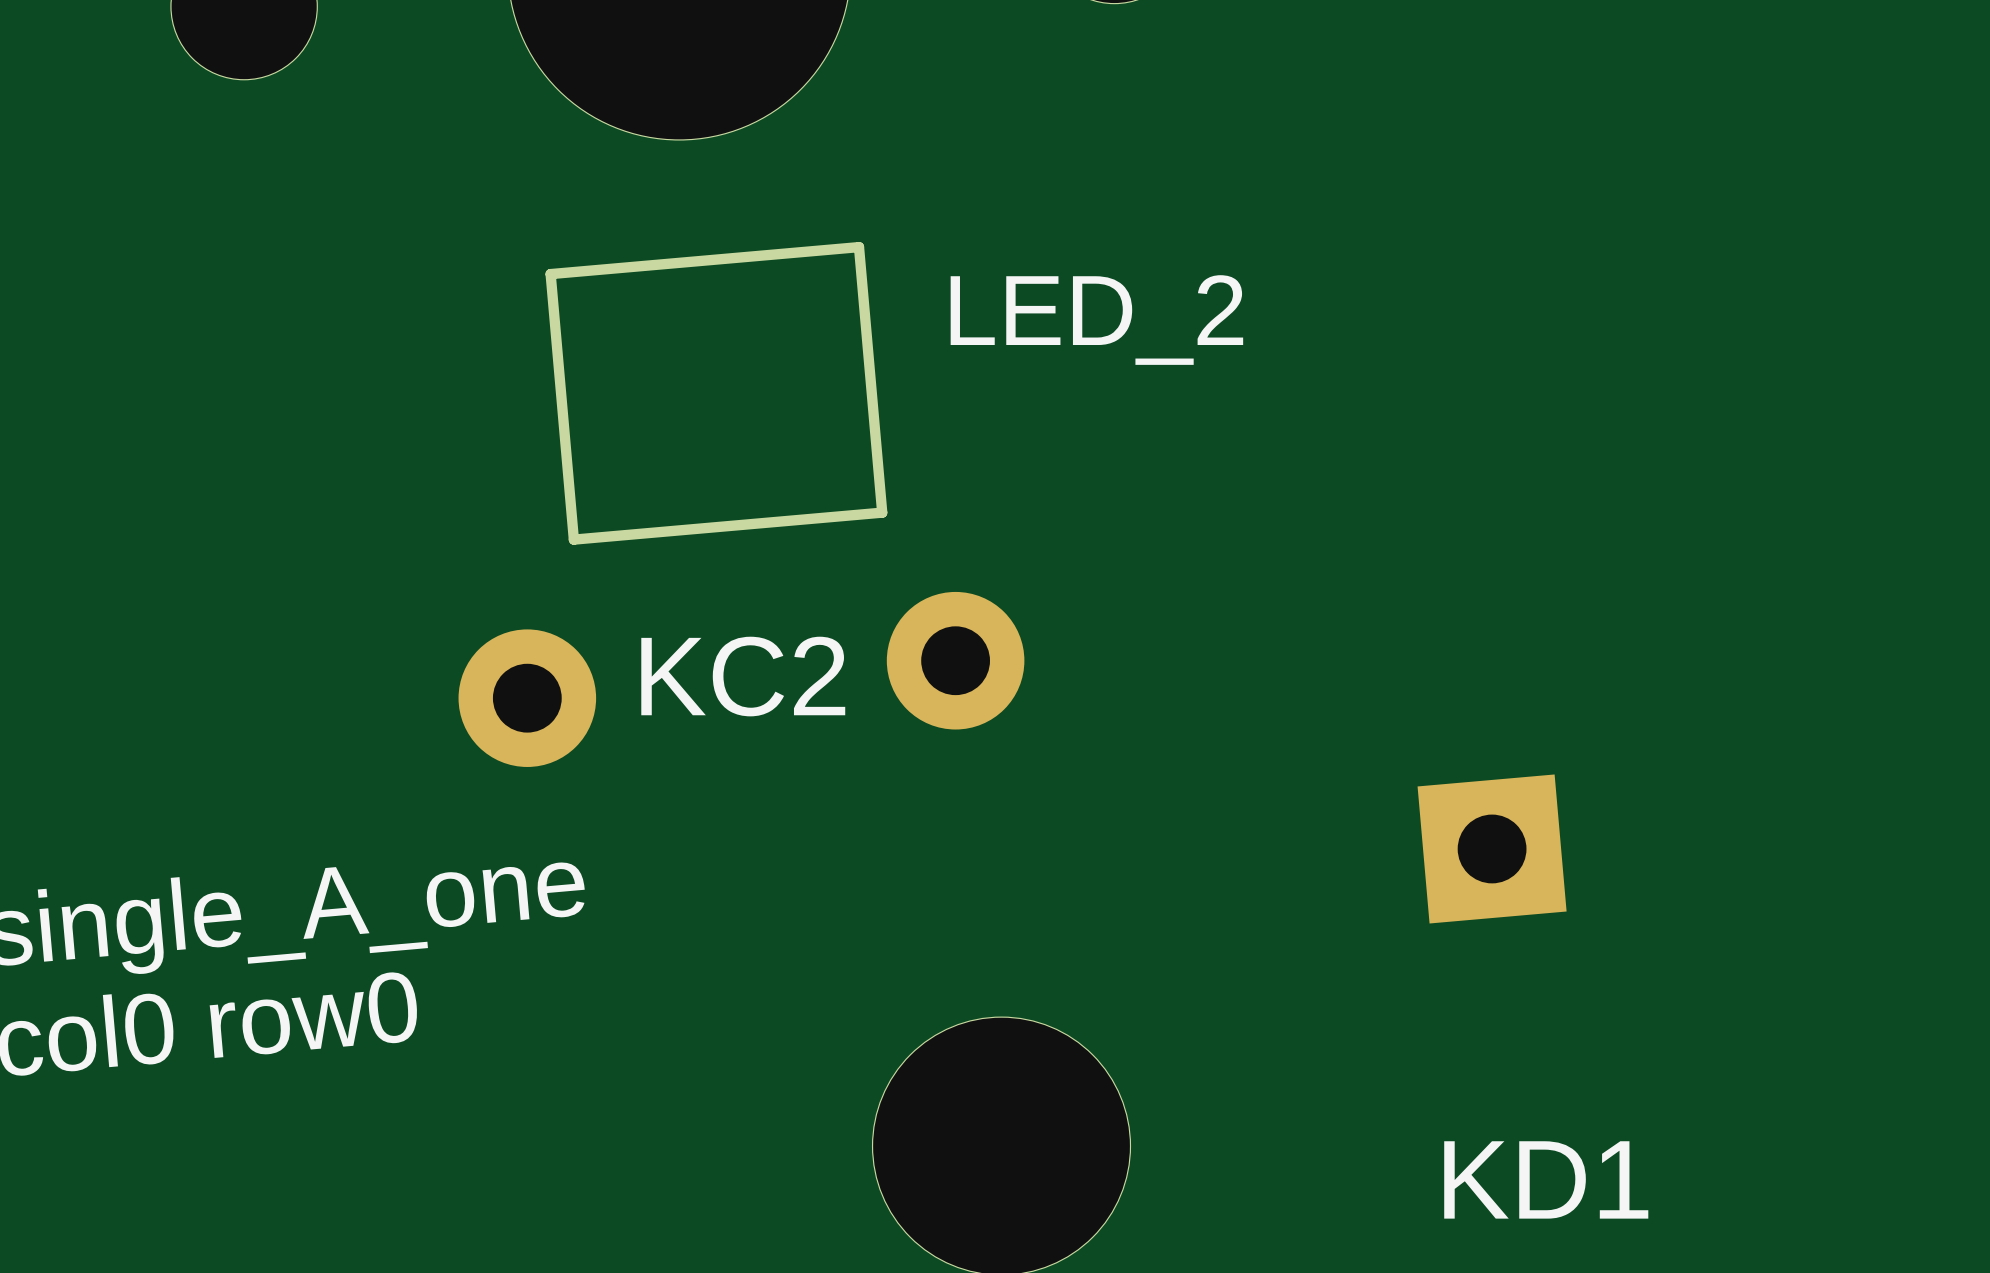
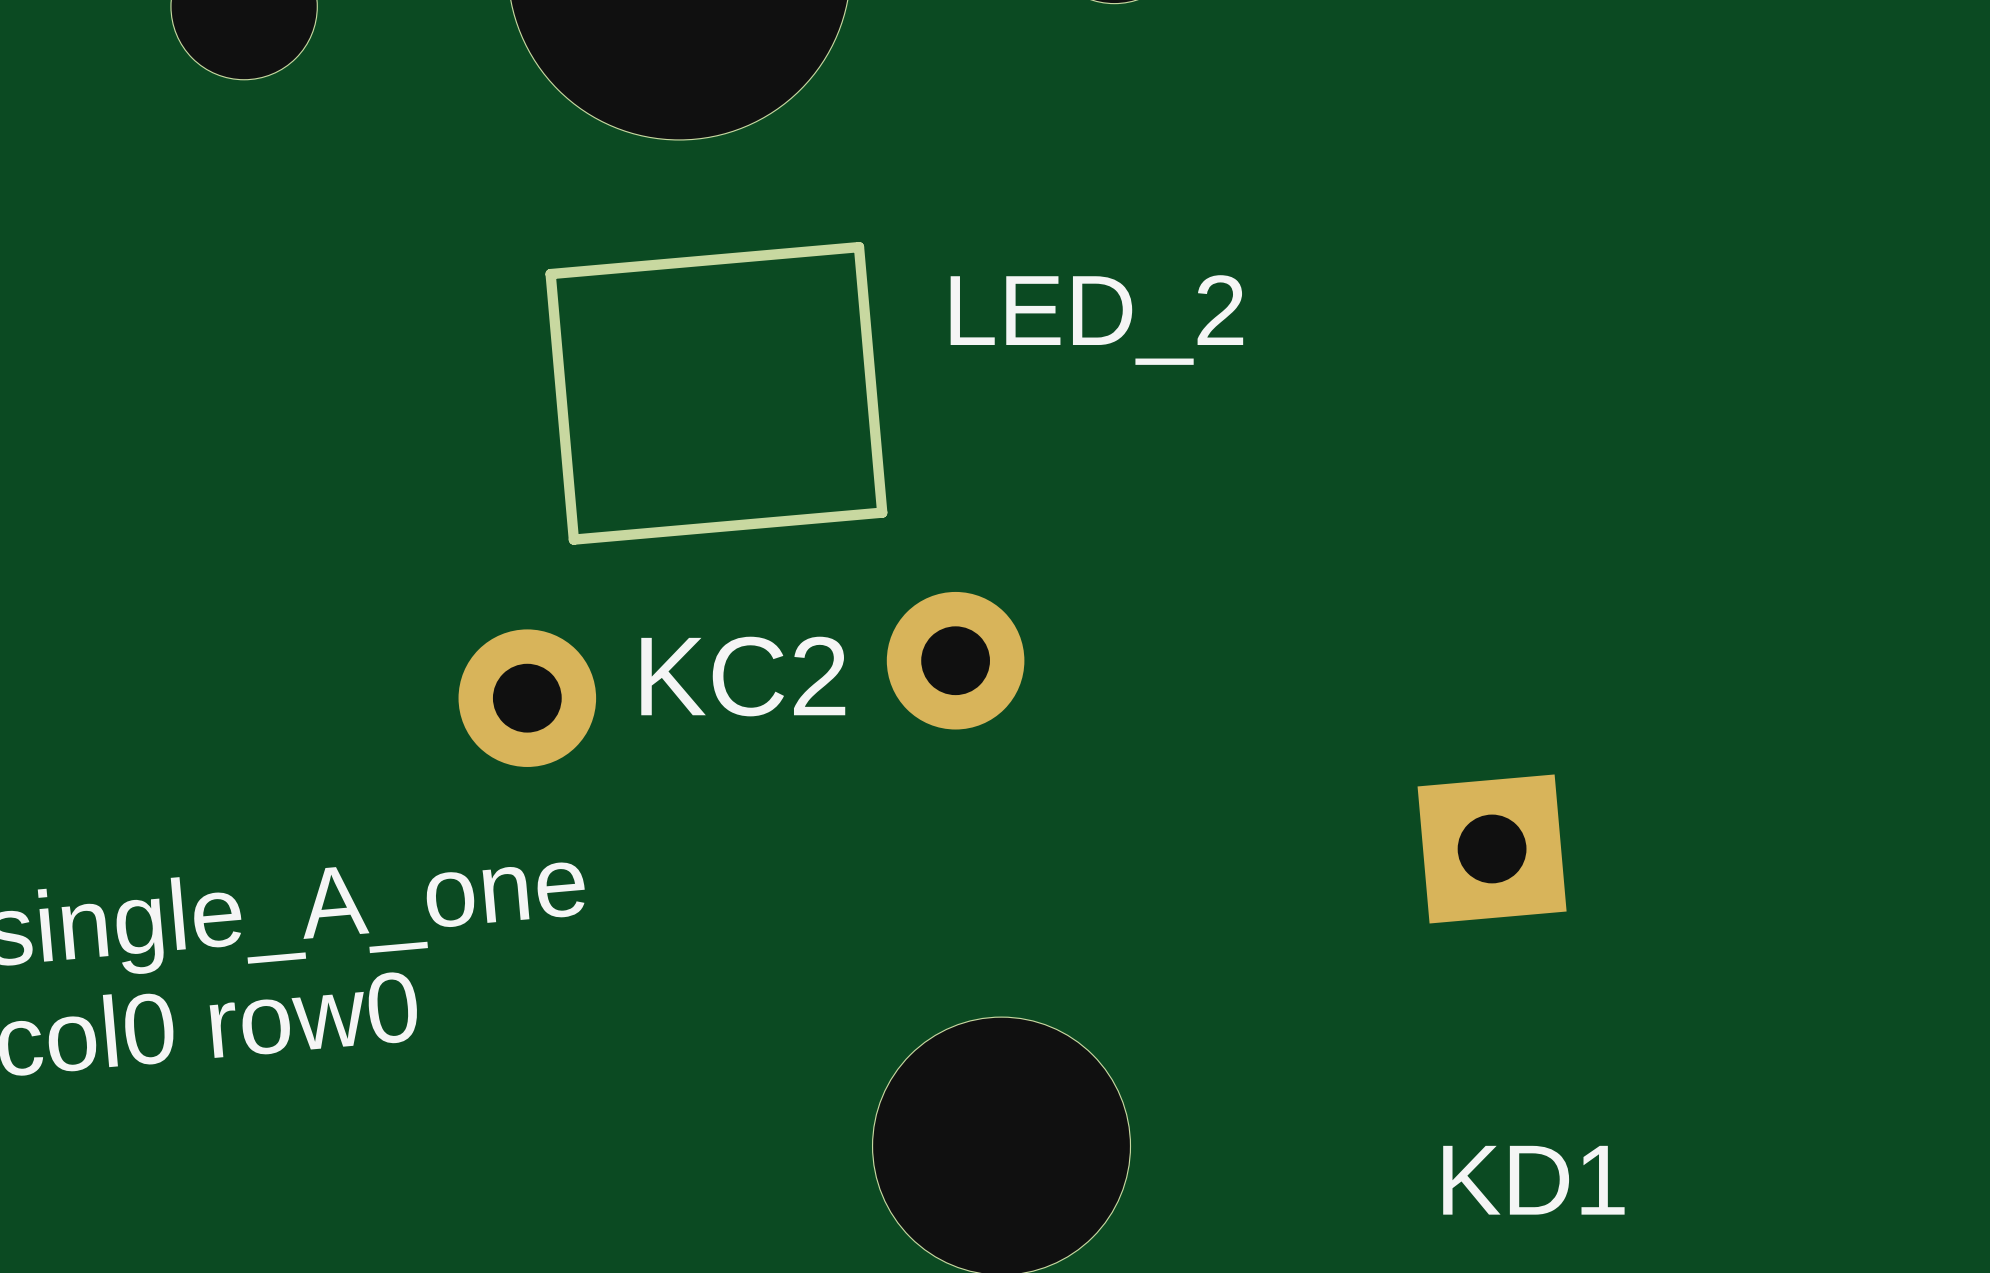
text position: KD1 (1546, 1179) -> KD1 (1533, 1180)

